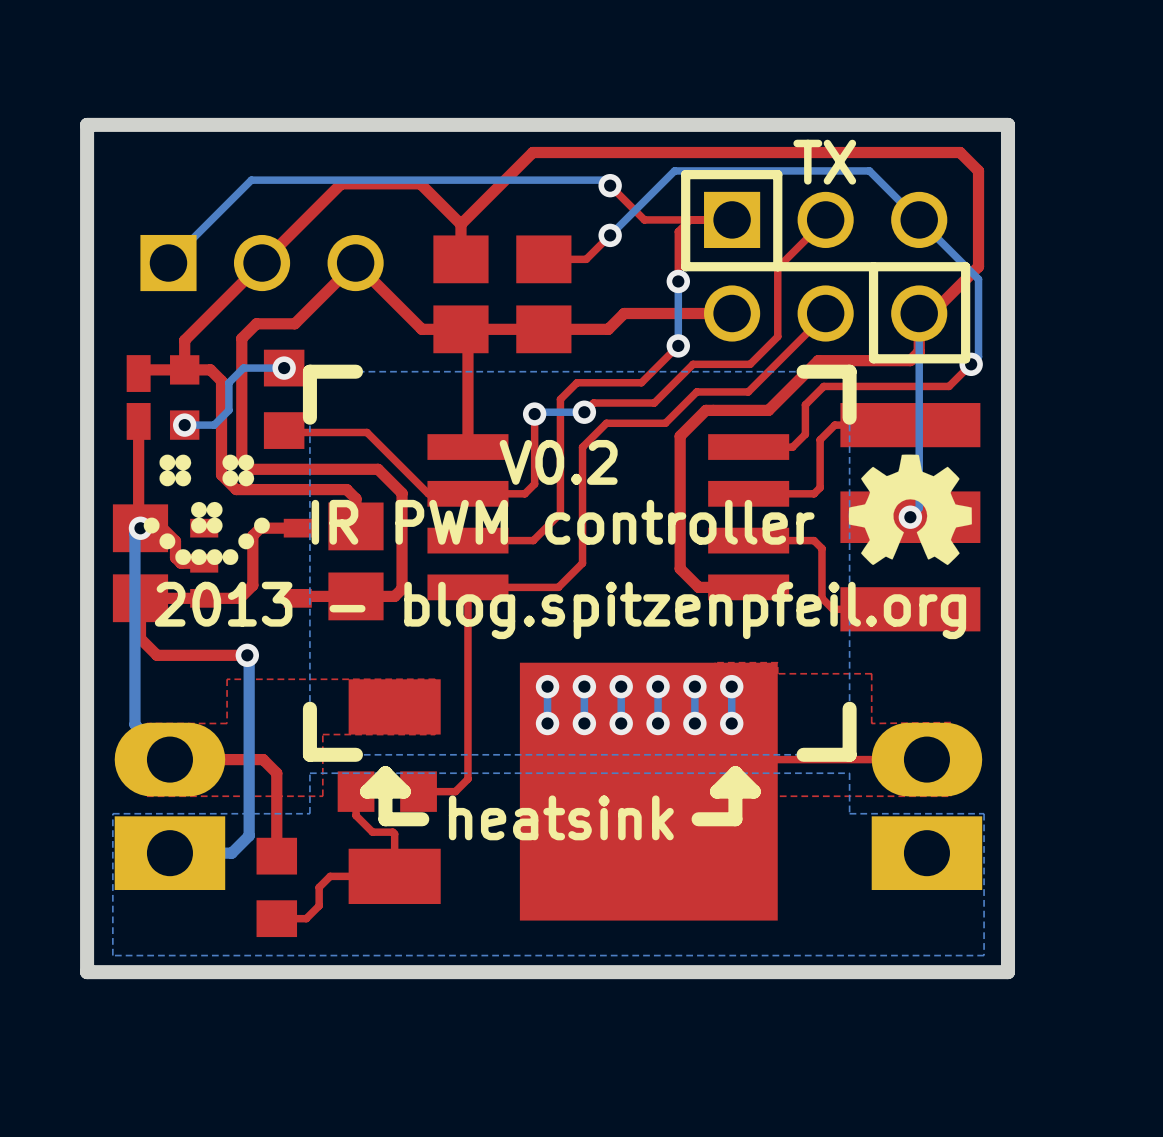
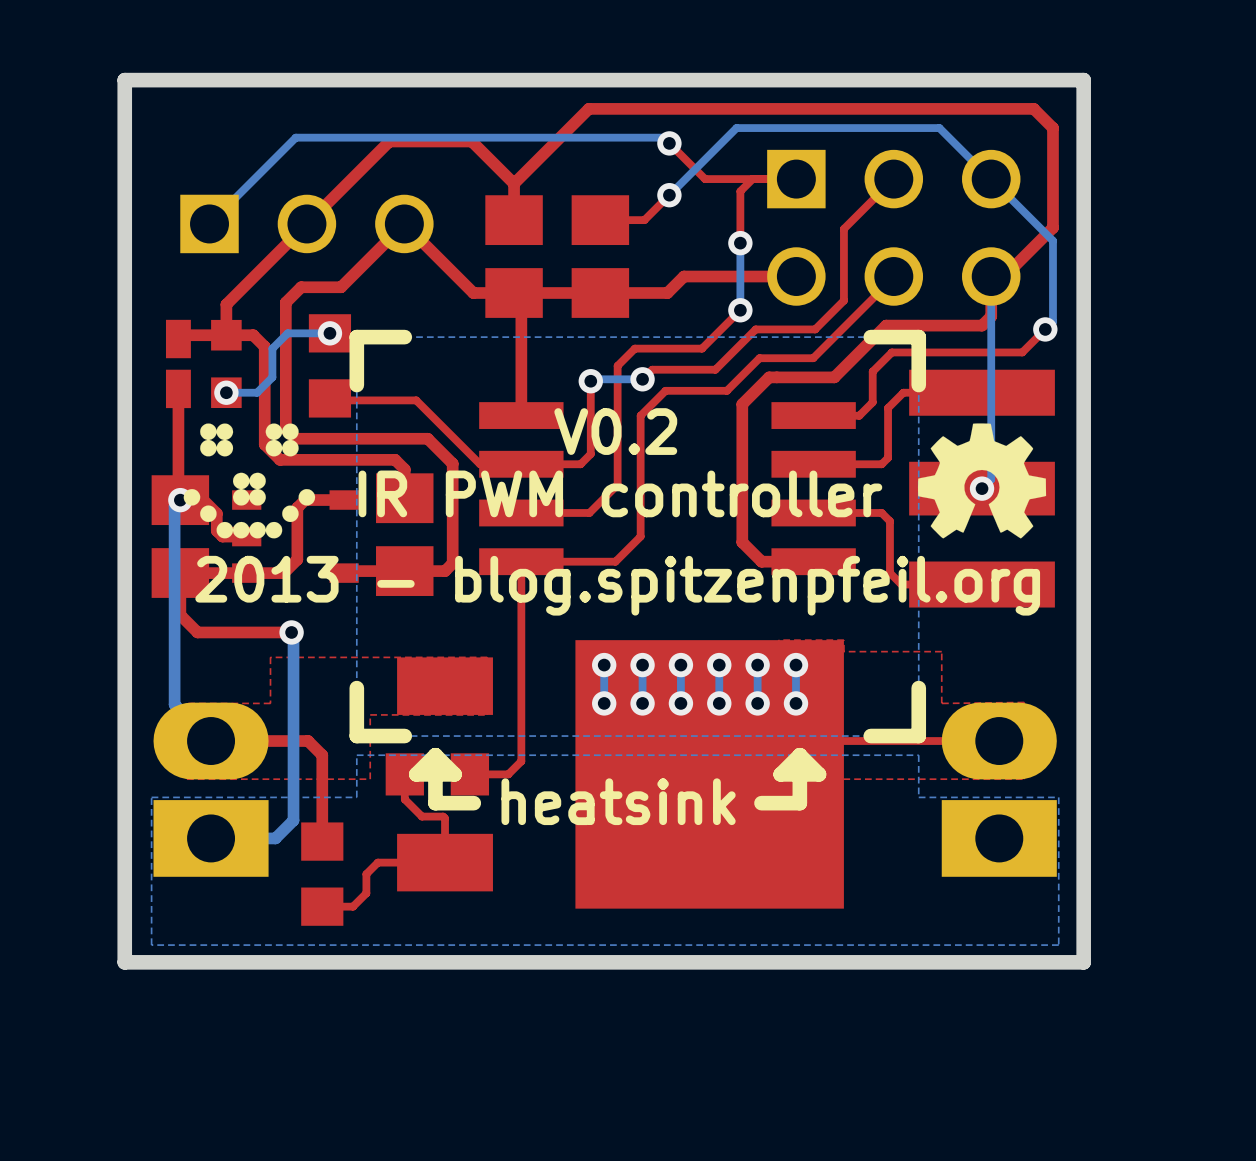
text: TX (824, 162) -> none
part footprint: [681, 170, 971, 364] -> [767, 149, 1021, 306]

